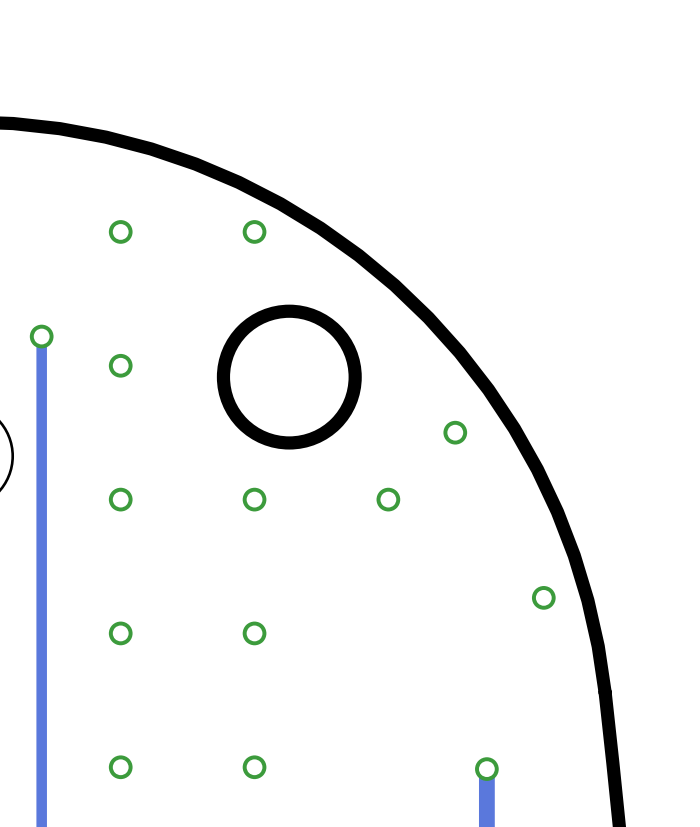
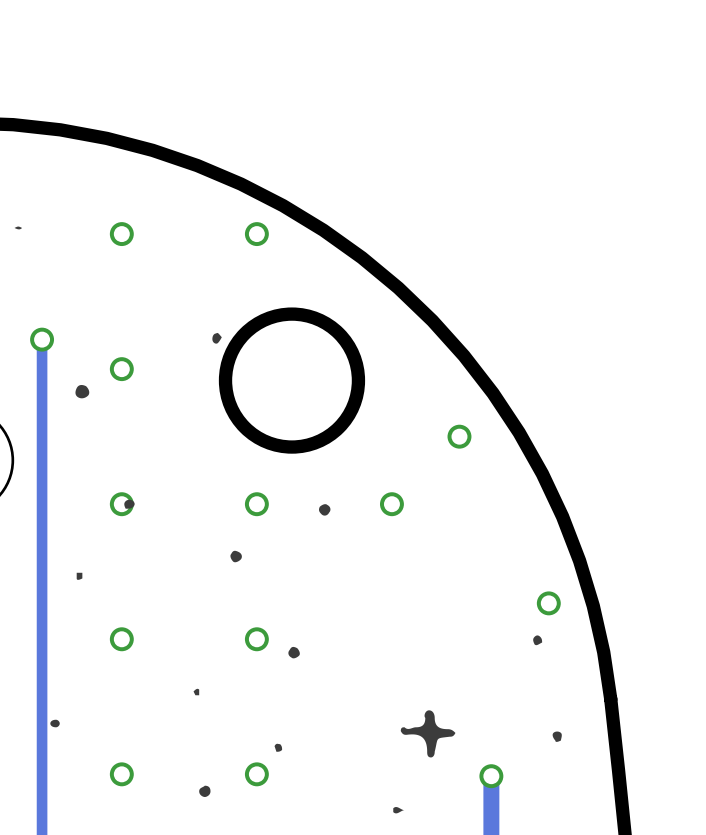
drawing: none -> [14, 226, 23, 230]
drawing: none -> [212, 332, 222, 344]
drawing: none -> [75, 385, 90, 399]
drawing: none -> [124, 499, 135, 509]
drawing: none -> [318, 504, 331, 516]
drawing: none -> [230, 550, 242, 563]
drawing: none -> [76, 572, 83, 580]
drawing: none -> [533, 635, 543, 646]
drawing: none -> [288, 646, 300, 659]
drawing: none -> [193, 688, 200, 696]
drawing: none -> [393, 710, 456, 814]
drawing: none -> [50, 719, 60, 728]
drawing: none -> [552, 731, 562, 742]
drawing: none -> [274, 743, 283, 752]
drawing: none -> [199, 785, 211, 798]

